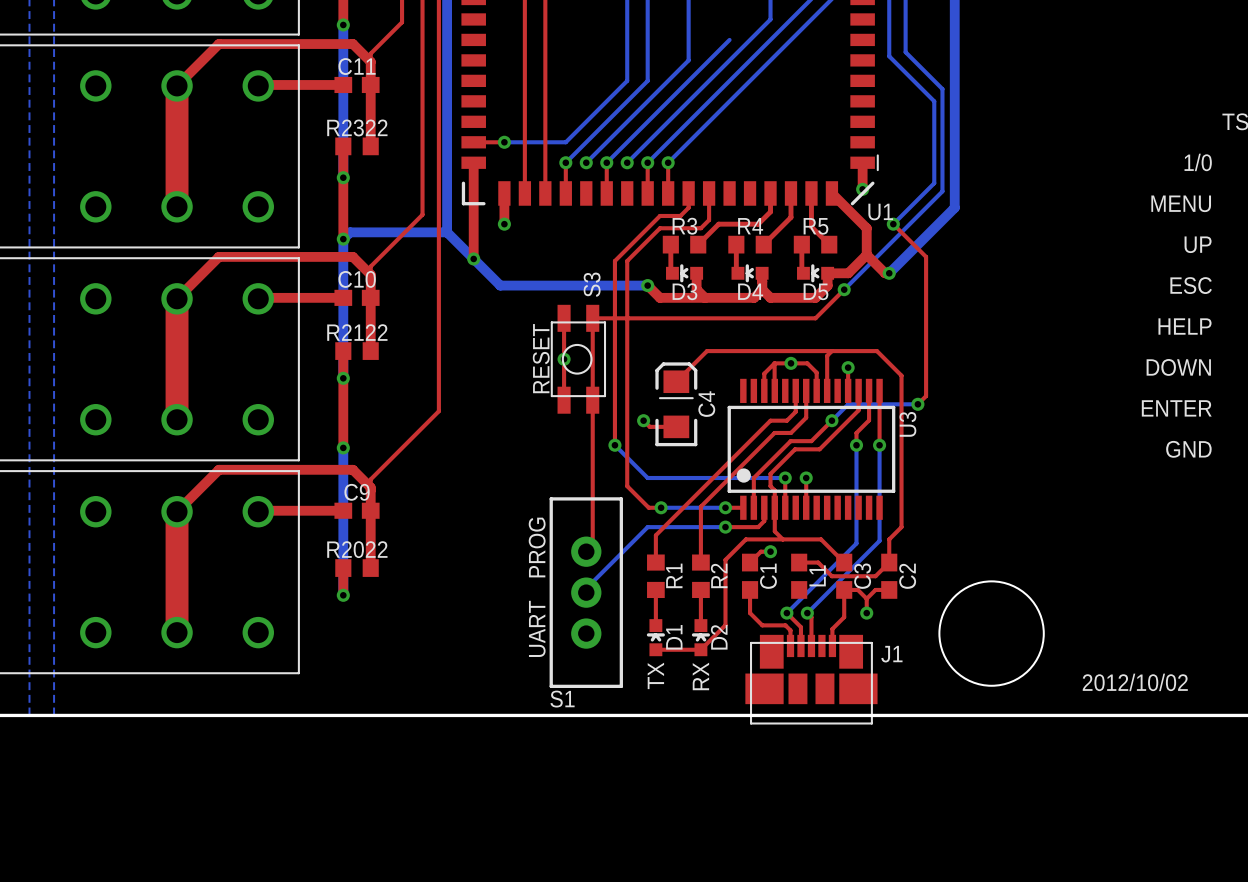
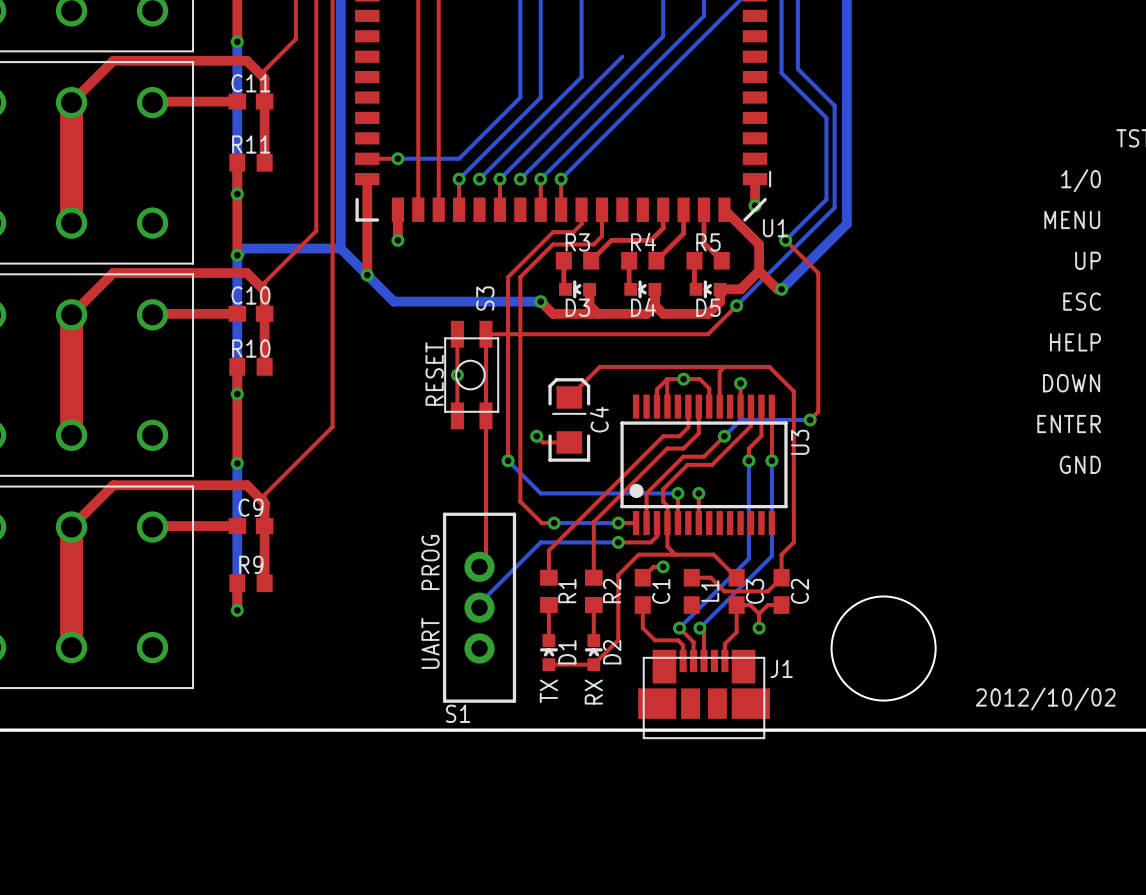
R2322 name: R2322 (357, 127) -> R11 (251, 144)
R2122 name: R2122 (357, 332) -> R10 (251, 348)
R2022 name: R2022 (357, 549) -> R9 (251, 564)

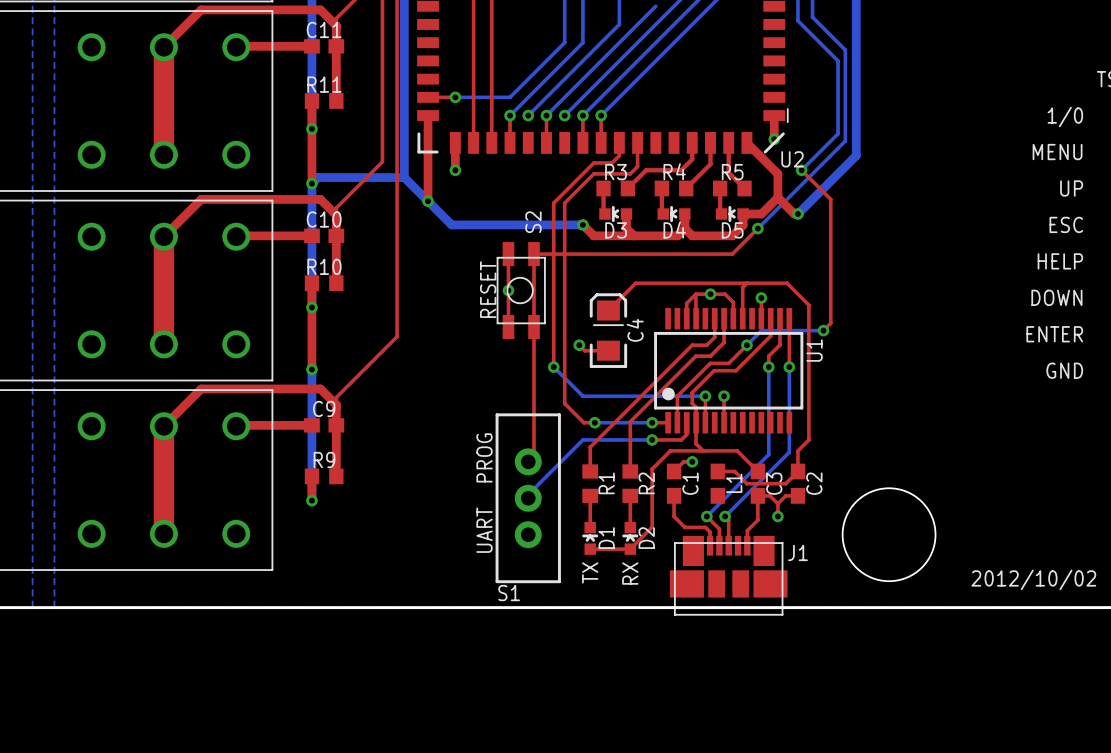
U1 name: U1 (775, 228) -> U2 (792, 159)
S3 name: S3 (485, 298) -> S2 (533, 222)
U3 name: U3 (800, 442) -> U1 (814, 350)

